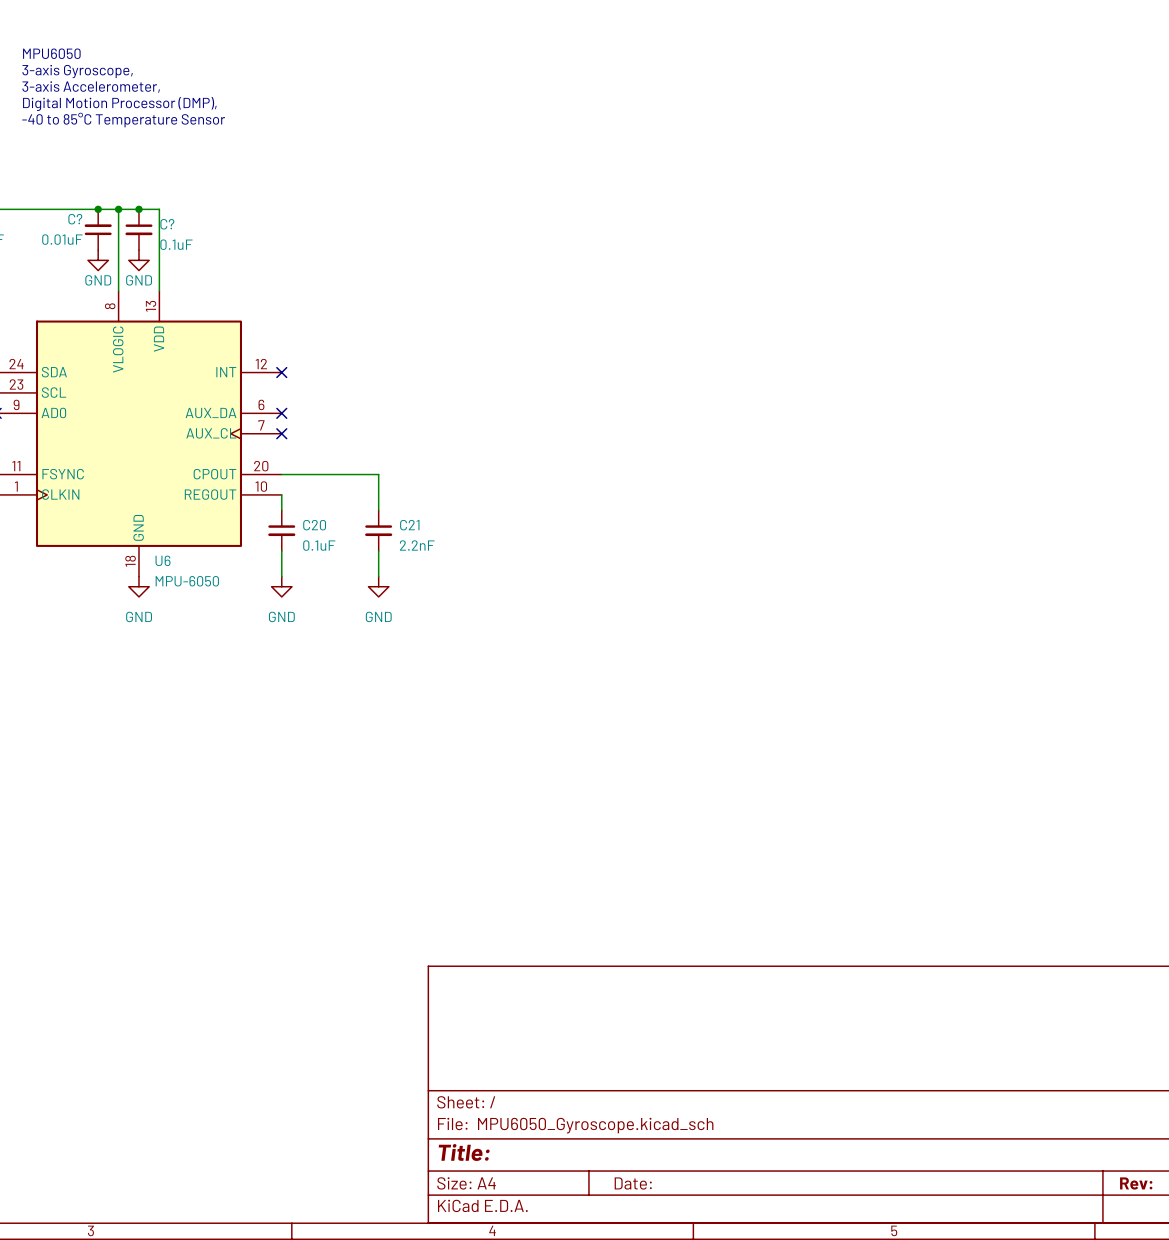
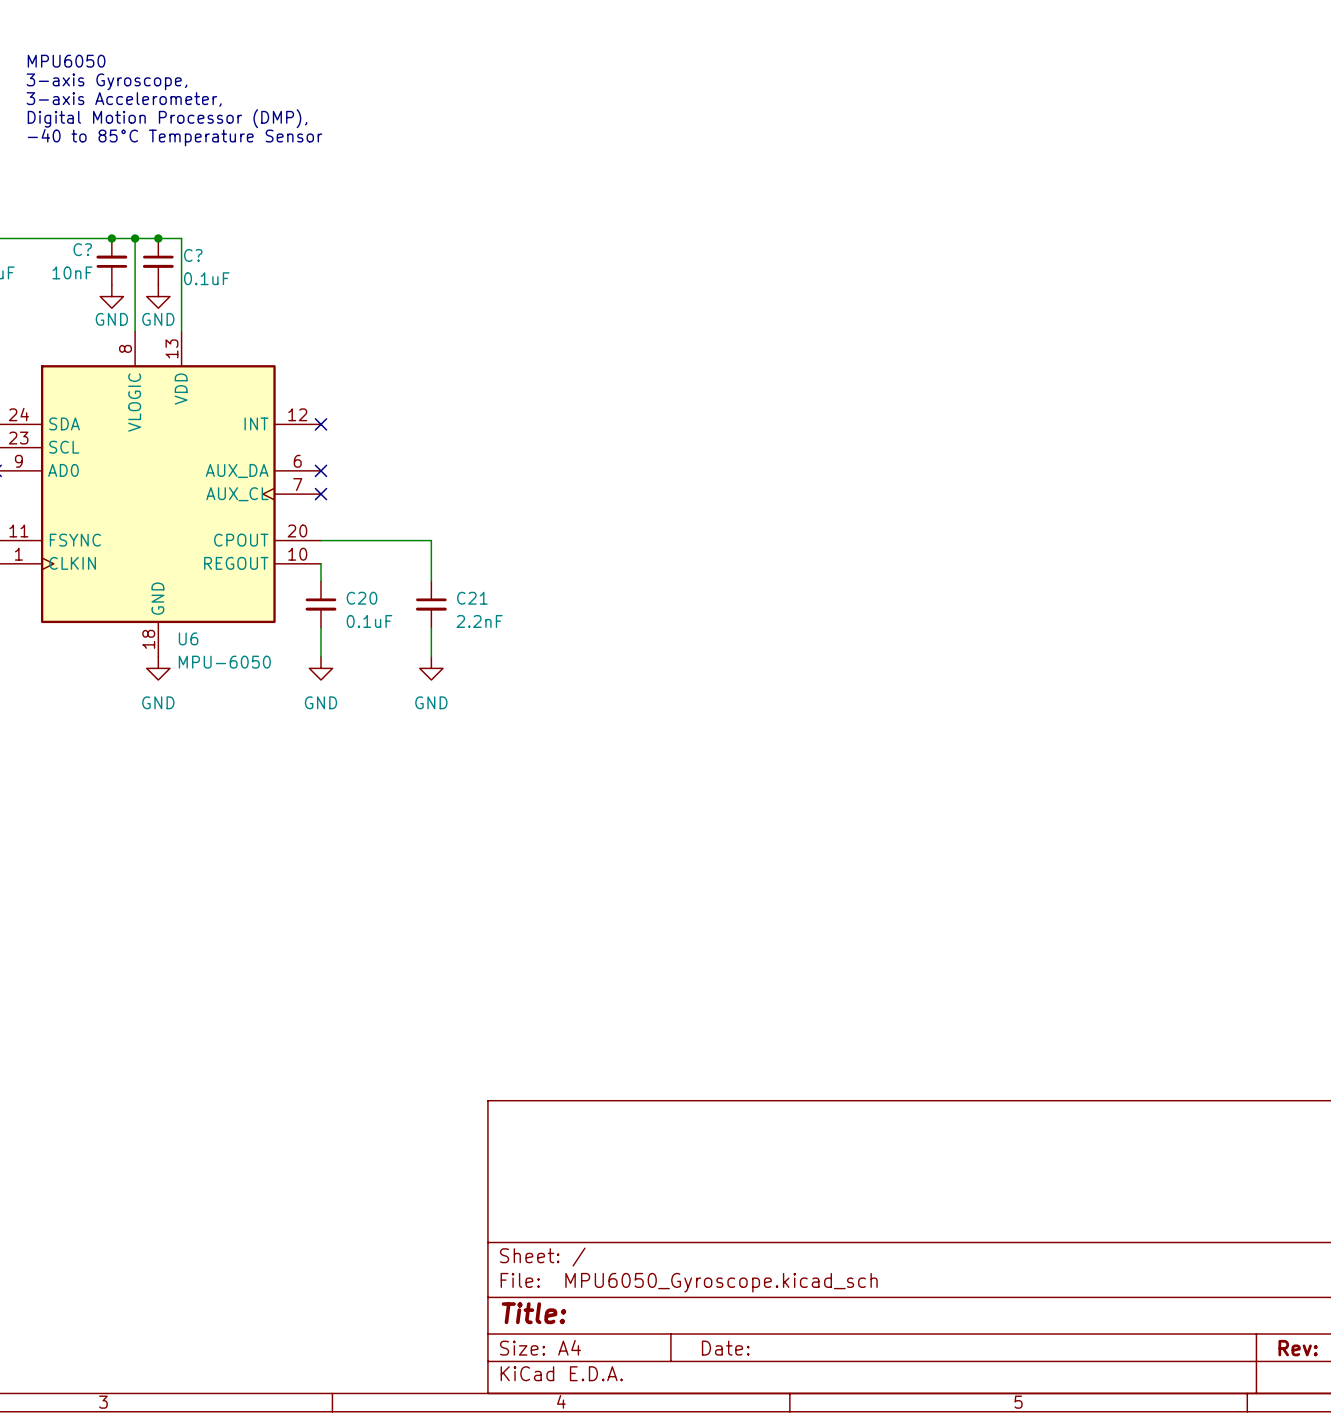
C? value: 0.01uF (62, 239) -> 10nF (72, 272)

